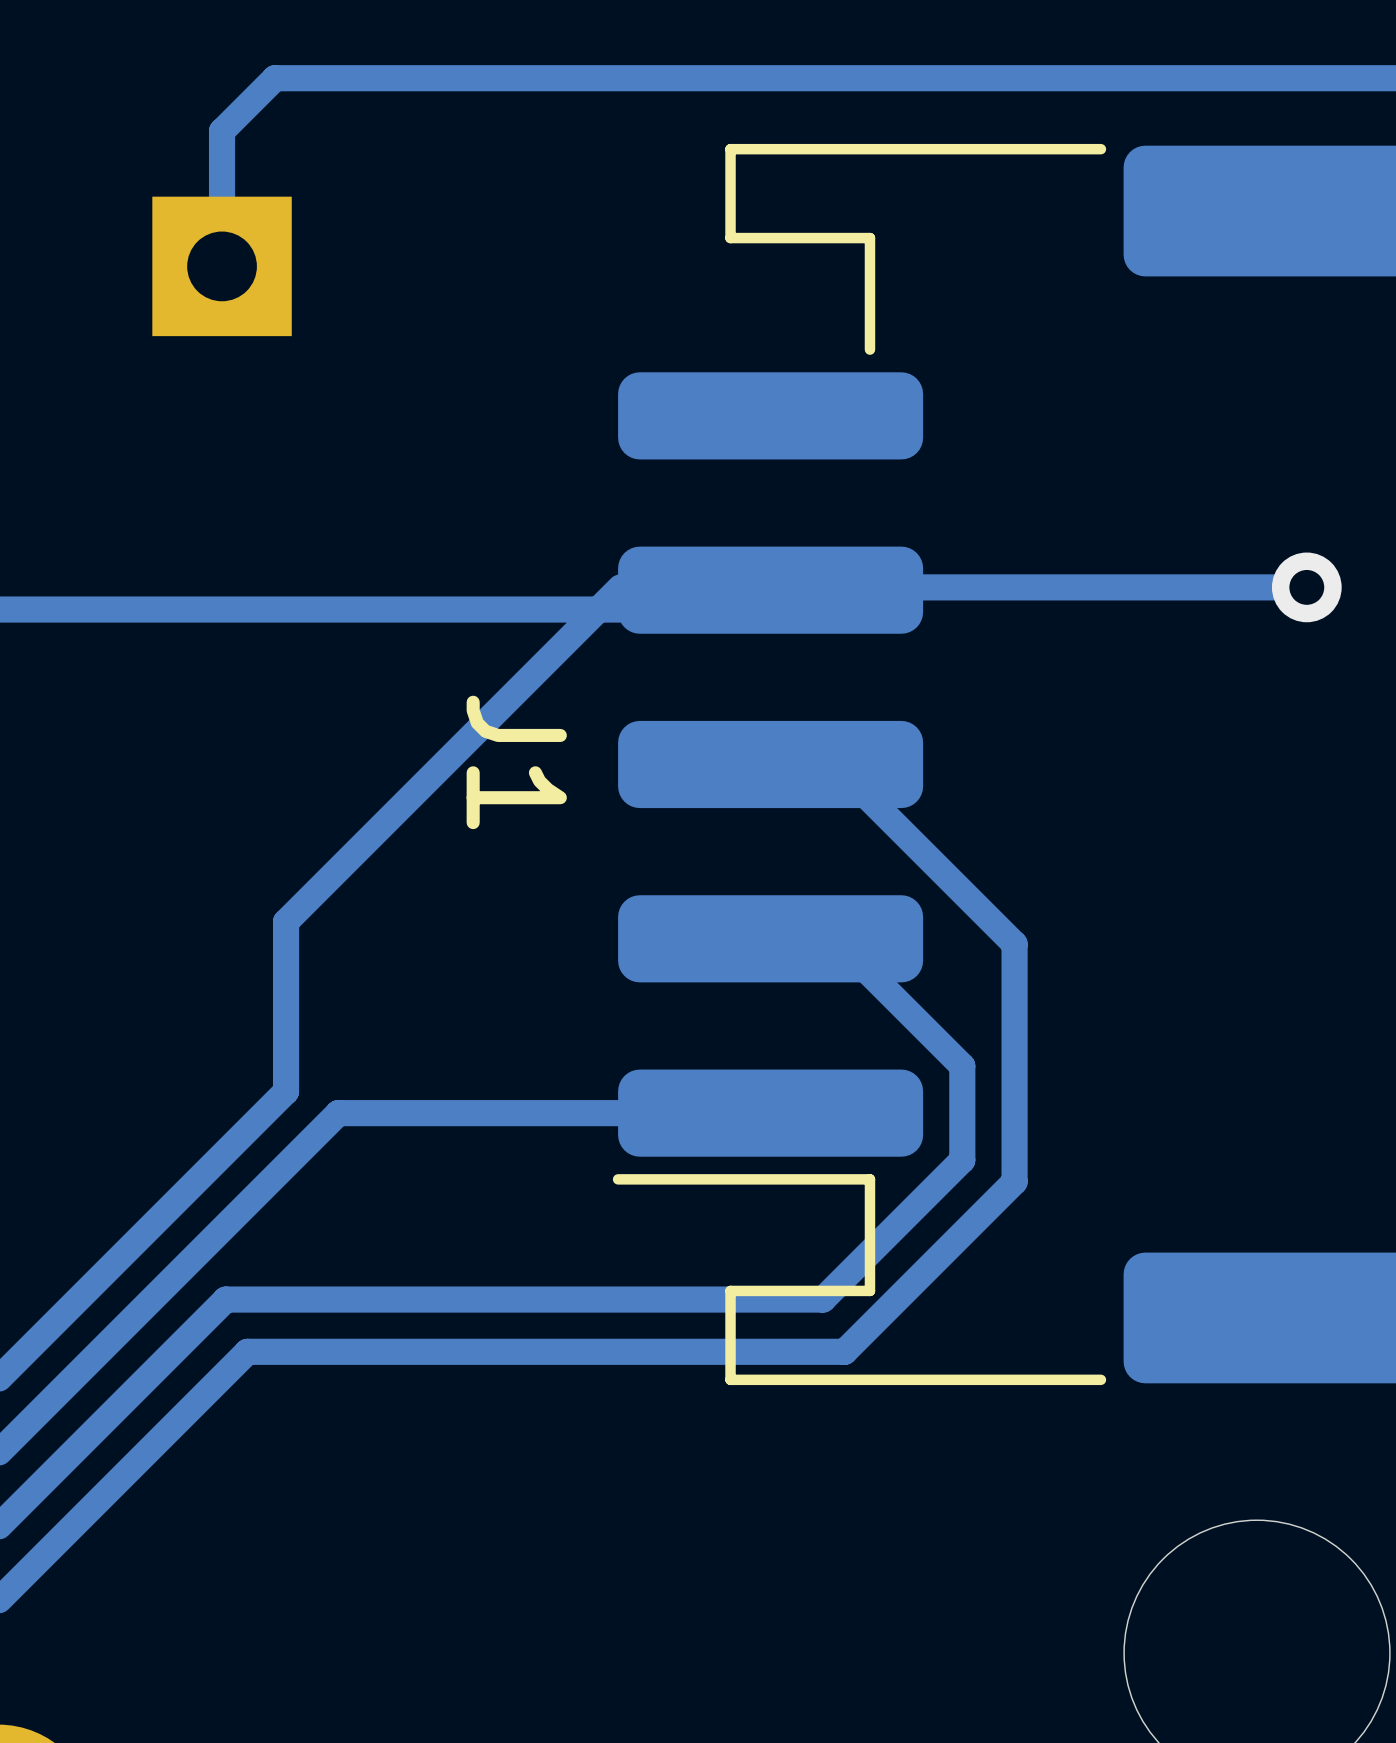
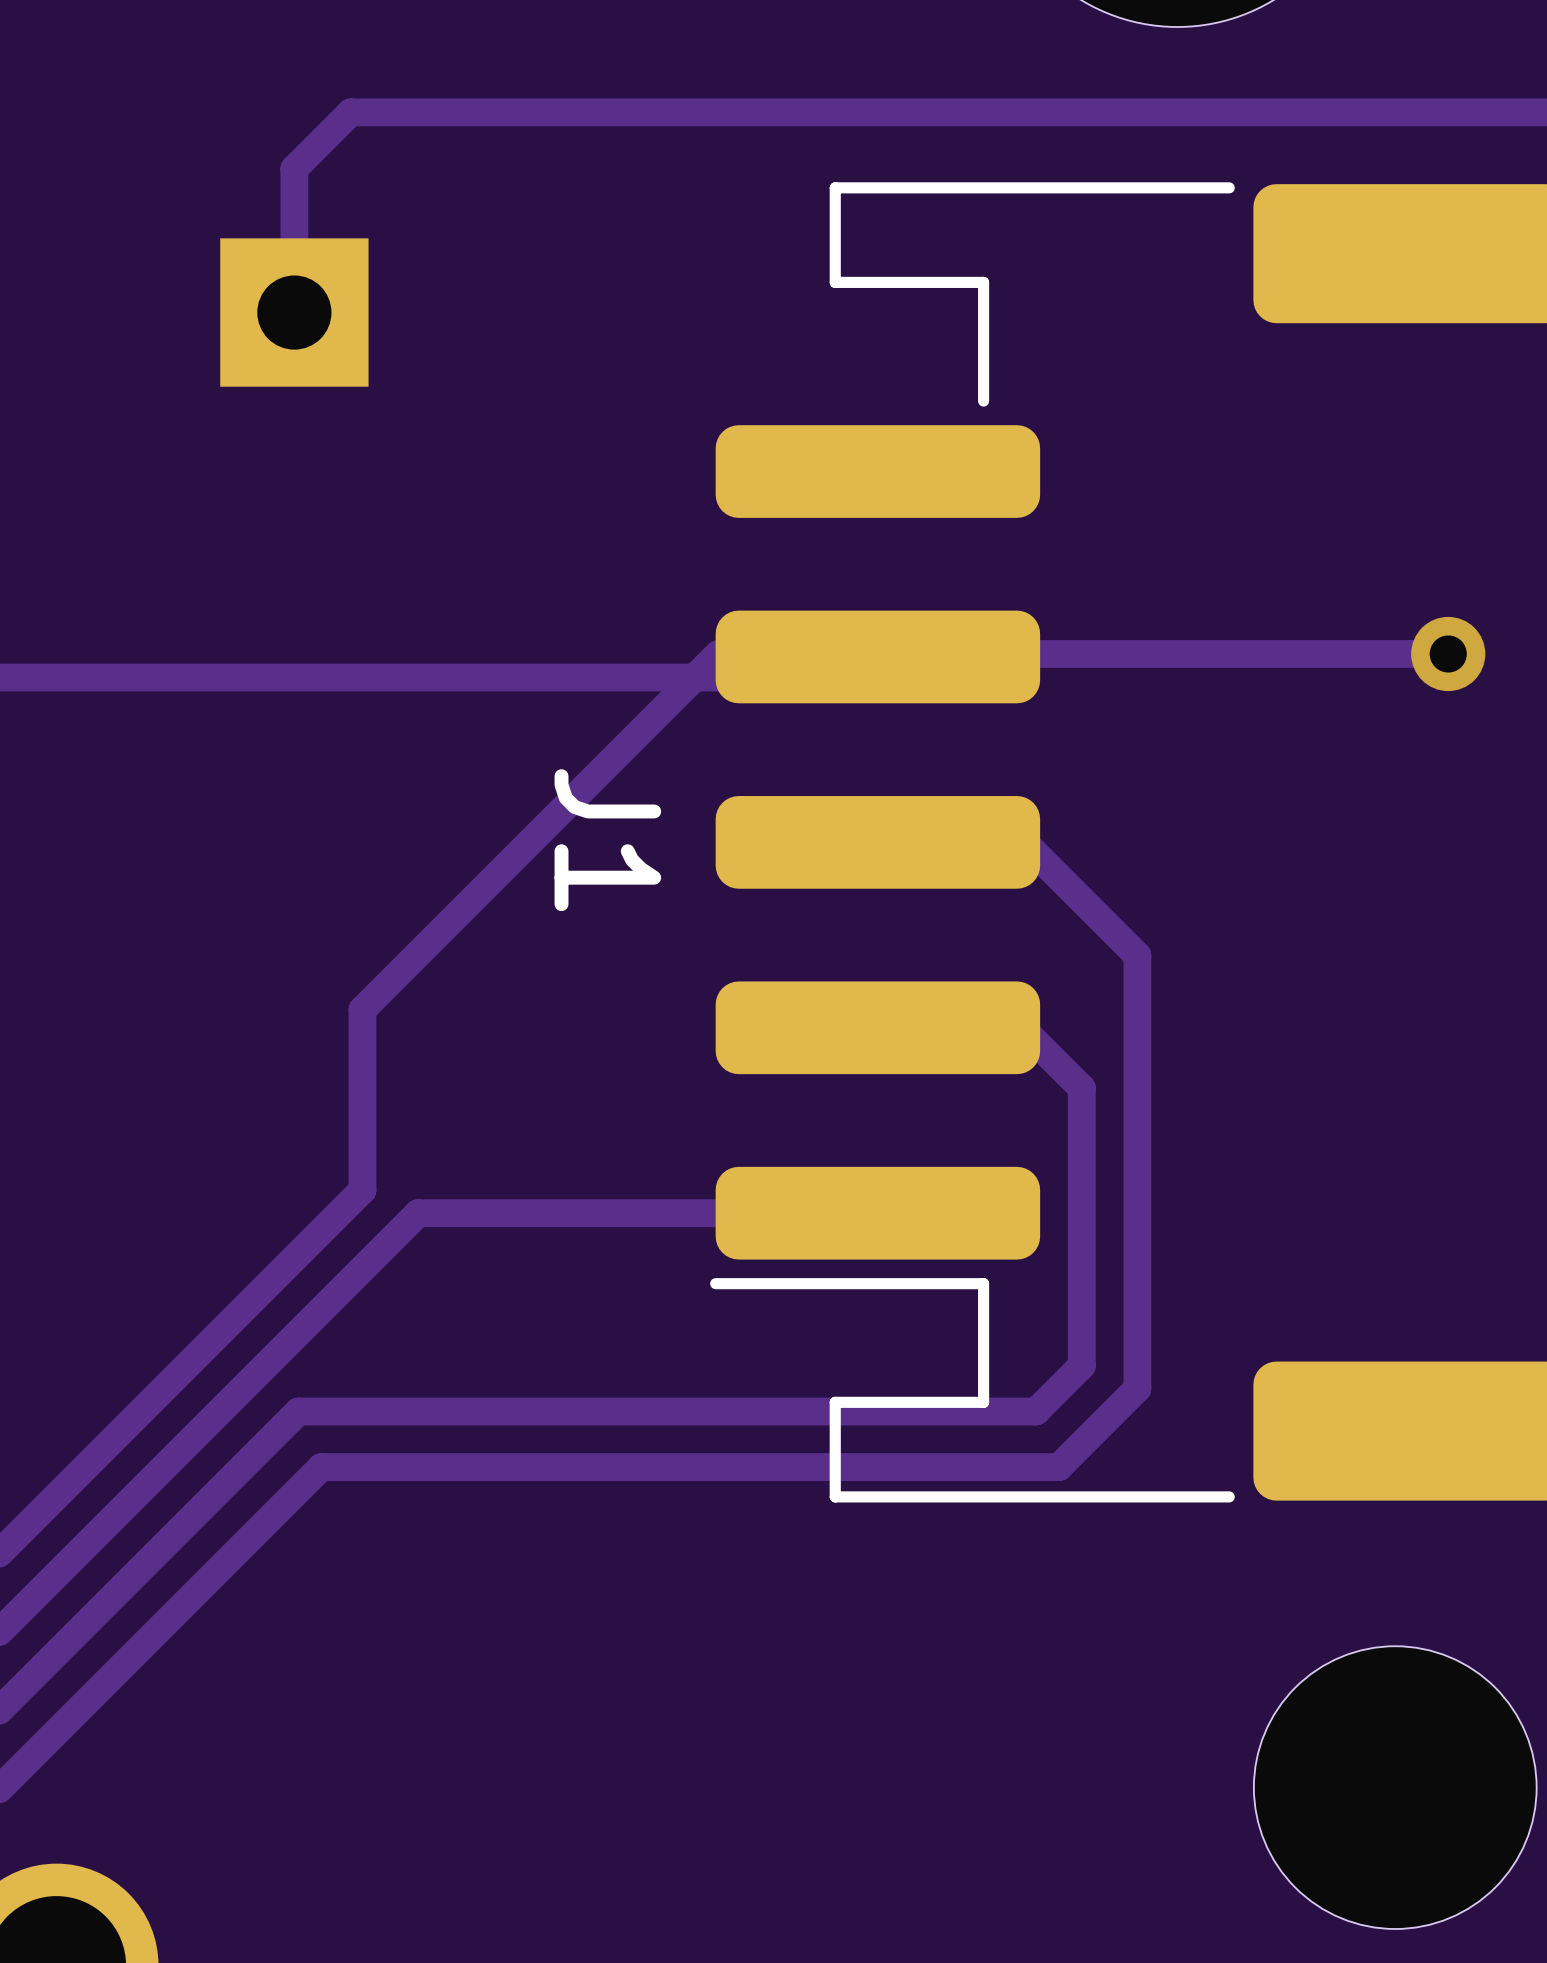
track: (835, 764) (1014, 944) -> (946, 842) (1024, 842) (1137, 955) (1137, 1033)
track: (835, 938) (962, 1066) -> (946, 1027) (1021, 1027) (1081, 1088) (1081, 1163)
track: (962, 1160) (822, 1299) -> (1081, 1263) (1081, 1365) (1035, 1411) (933, 1411)
track: (1014, 1181) (844, 1351) -> (1137, 1286) (1137, 1388) (1059, 1467) (956, 1467)

